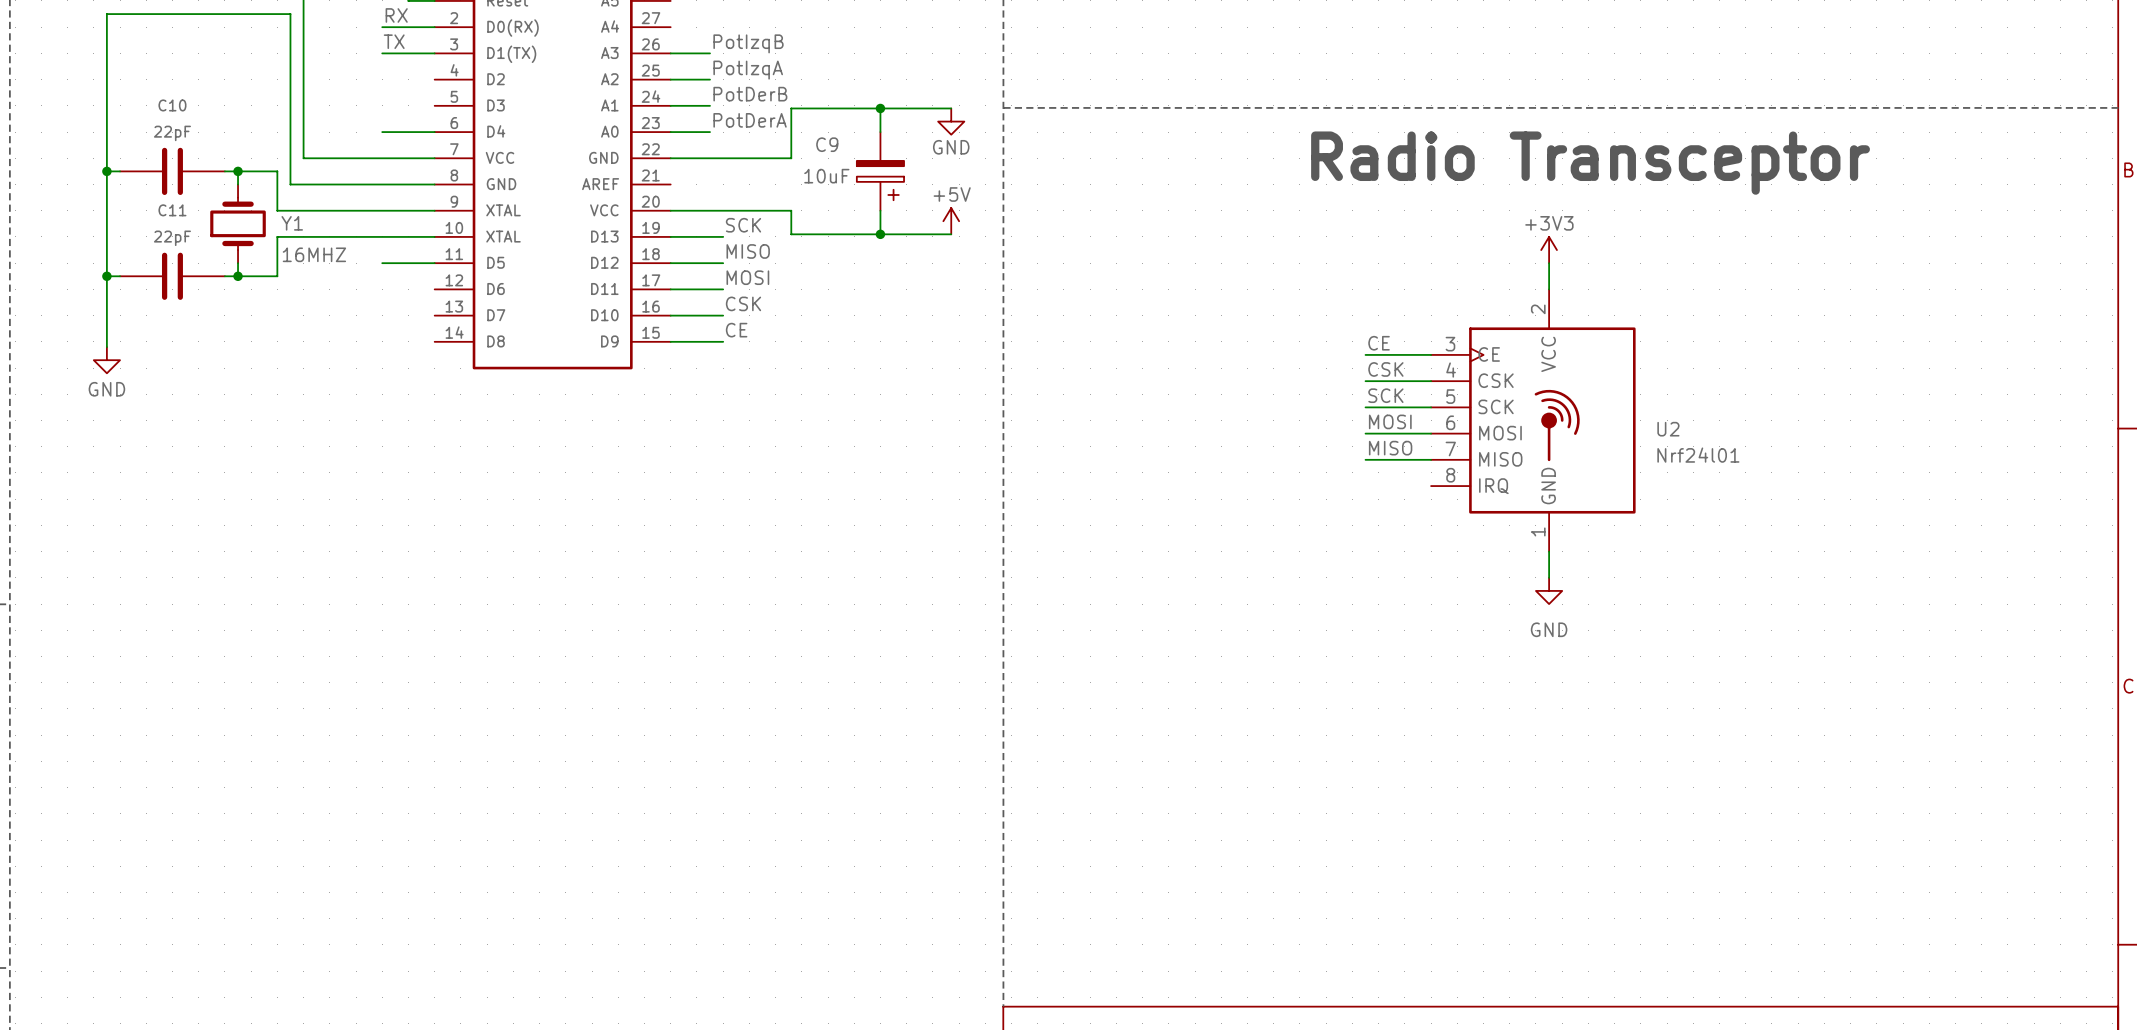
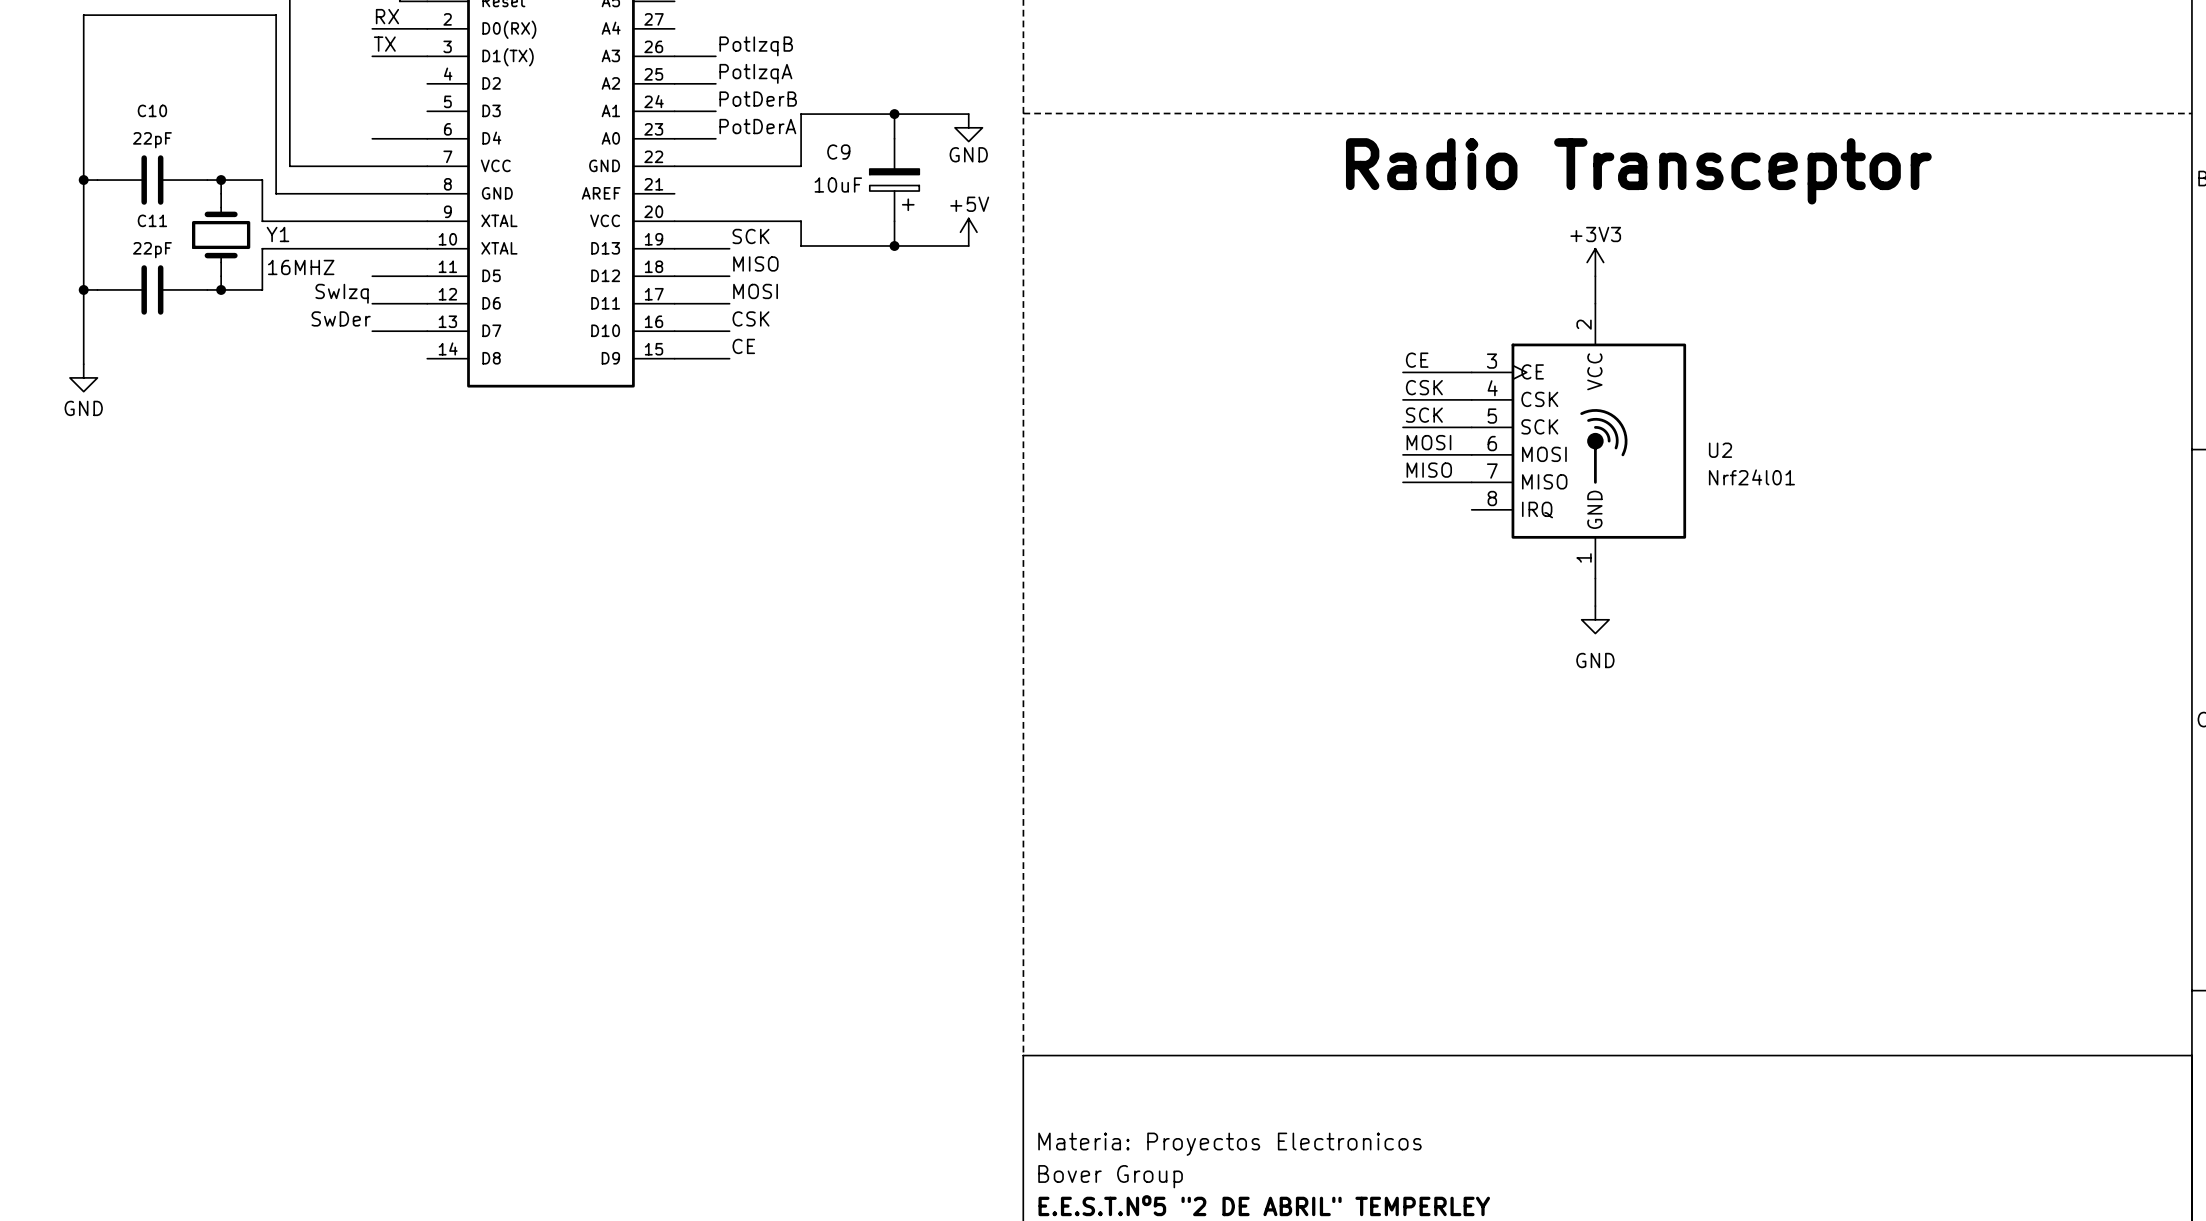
label: none -> SwIzq (342, 293)
wire: none -> (372, 303) (427, 303)
label: none -> SwDer (341, 318)
wire: none -> (372, 331) (427, 331)

